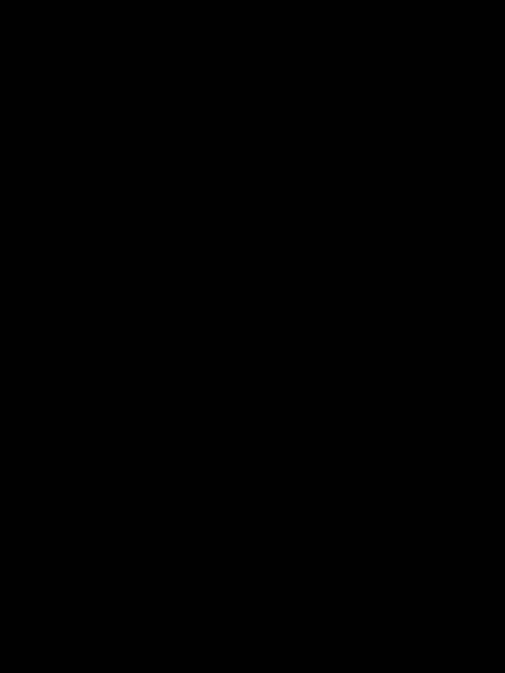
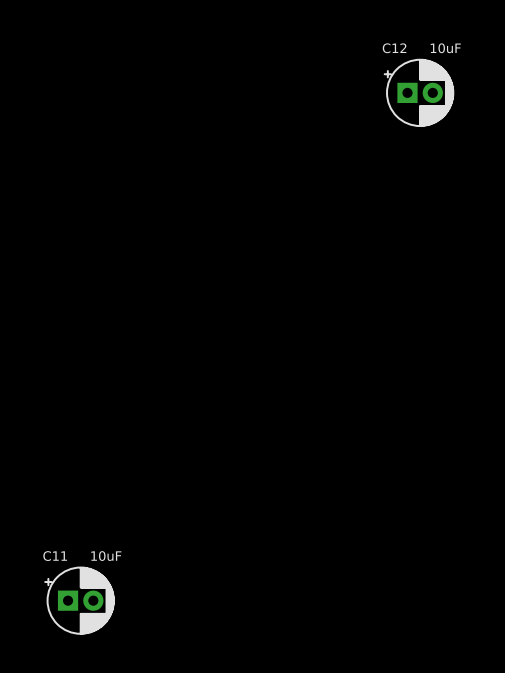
C12: none -> 10uF (418, 92)
C11: none -> 10uF (79, 600)

